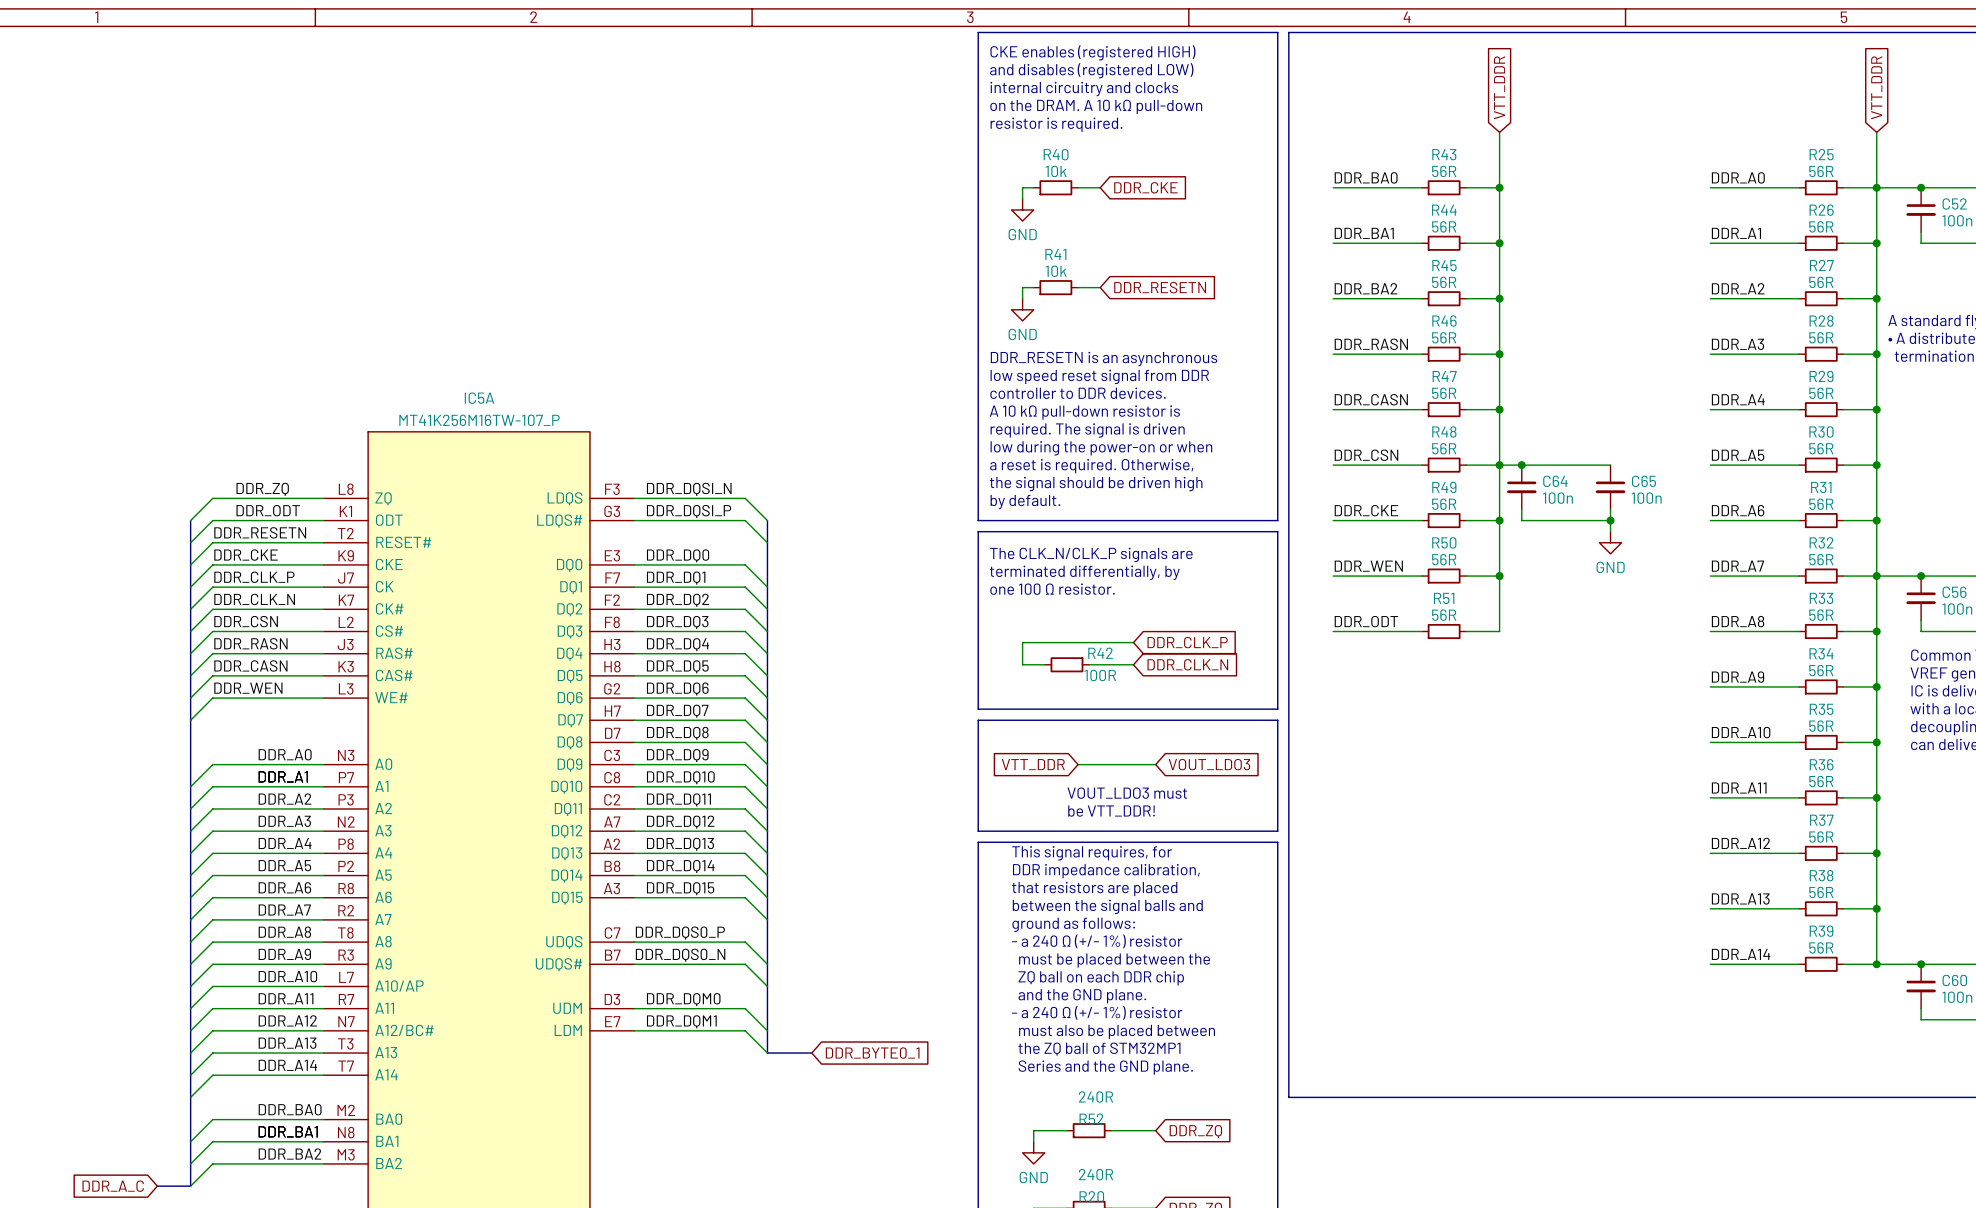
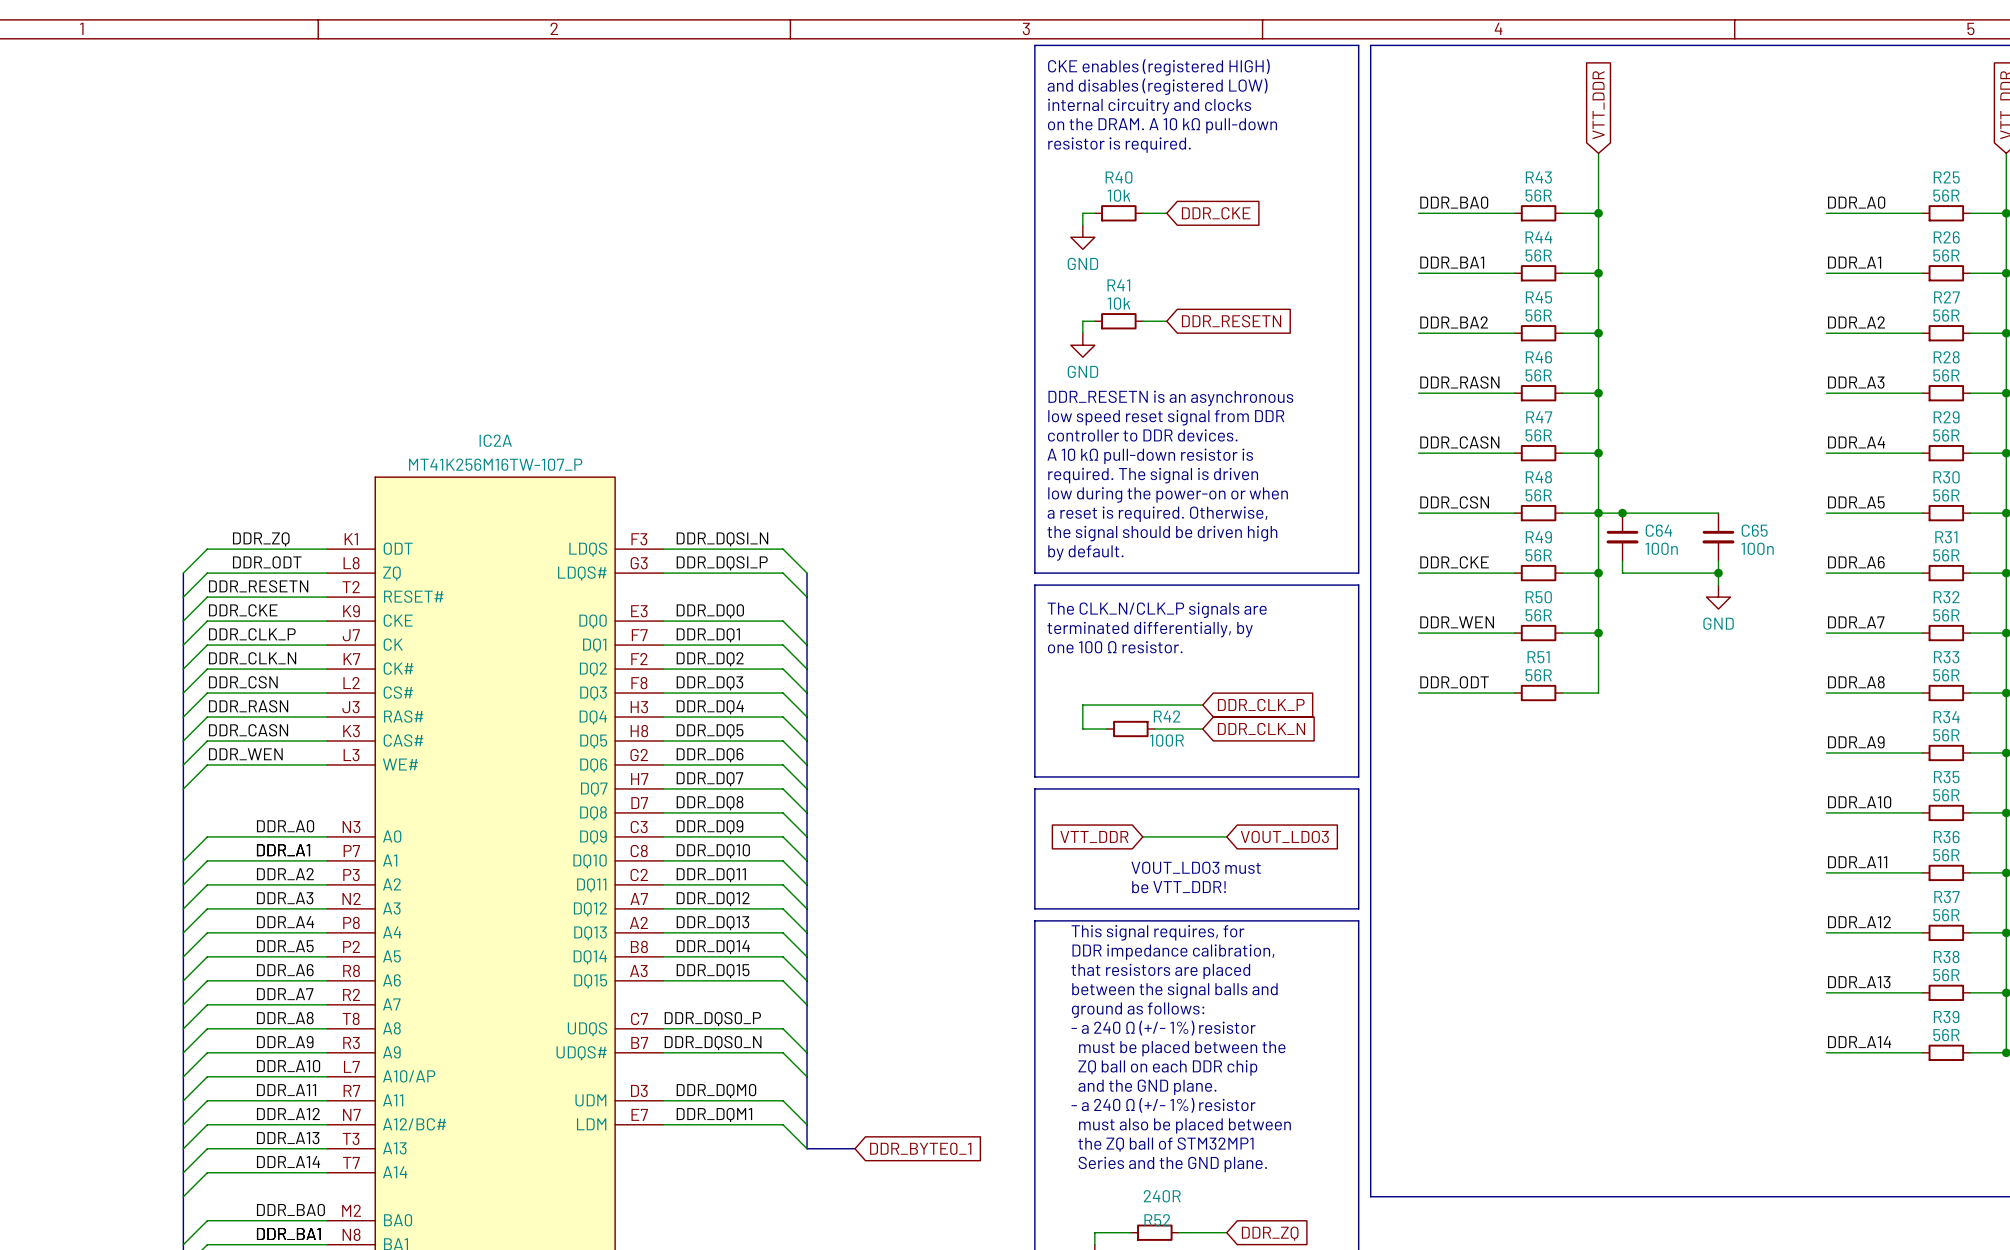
IC5A name: IC5A (479, 398) -> IC2A (495, 440)
IC5A pin number: L8 (346, 489) -> K1 (351, 539)
IC5A pin name: ZQ (383, 498) -> ODT (398, 548)
IC5A pin number: K1 (345, 511) -> L8 (351, 563)
IC5A pin name: ODT (389, 520) -> ZQ (391, 573)

